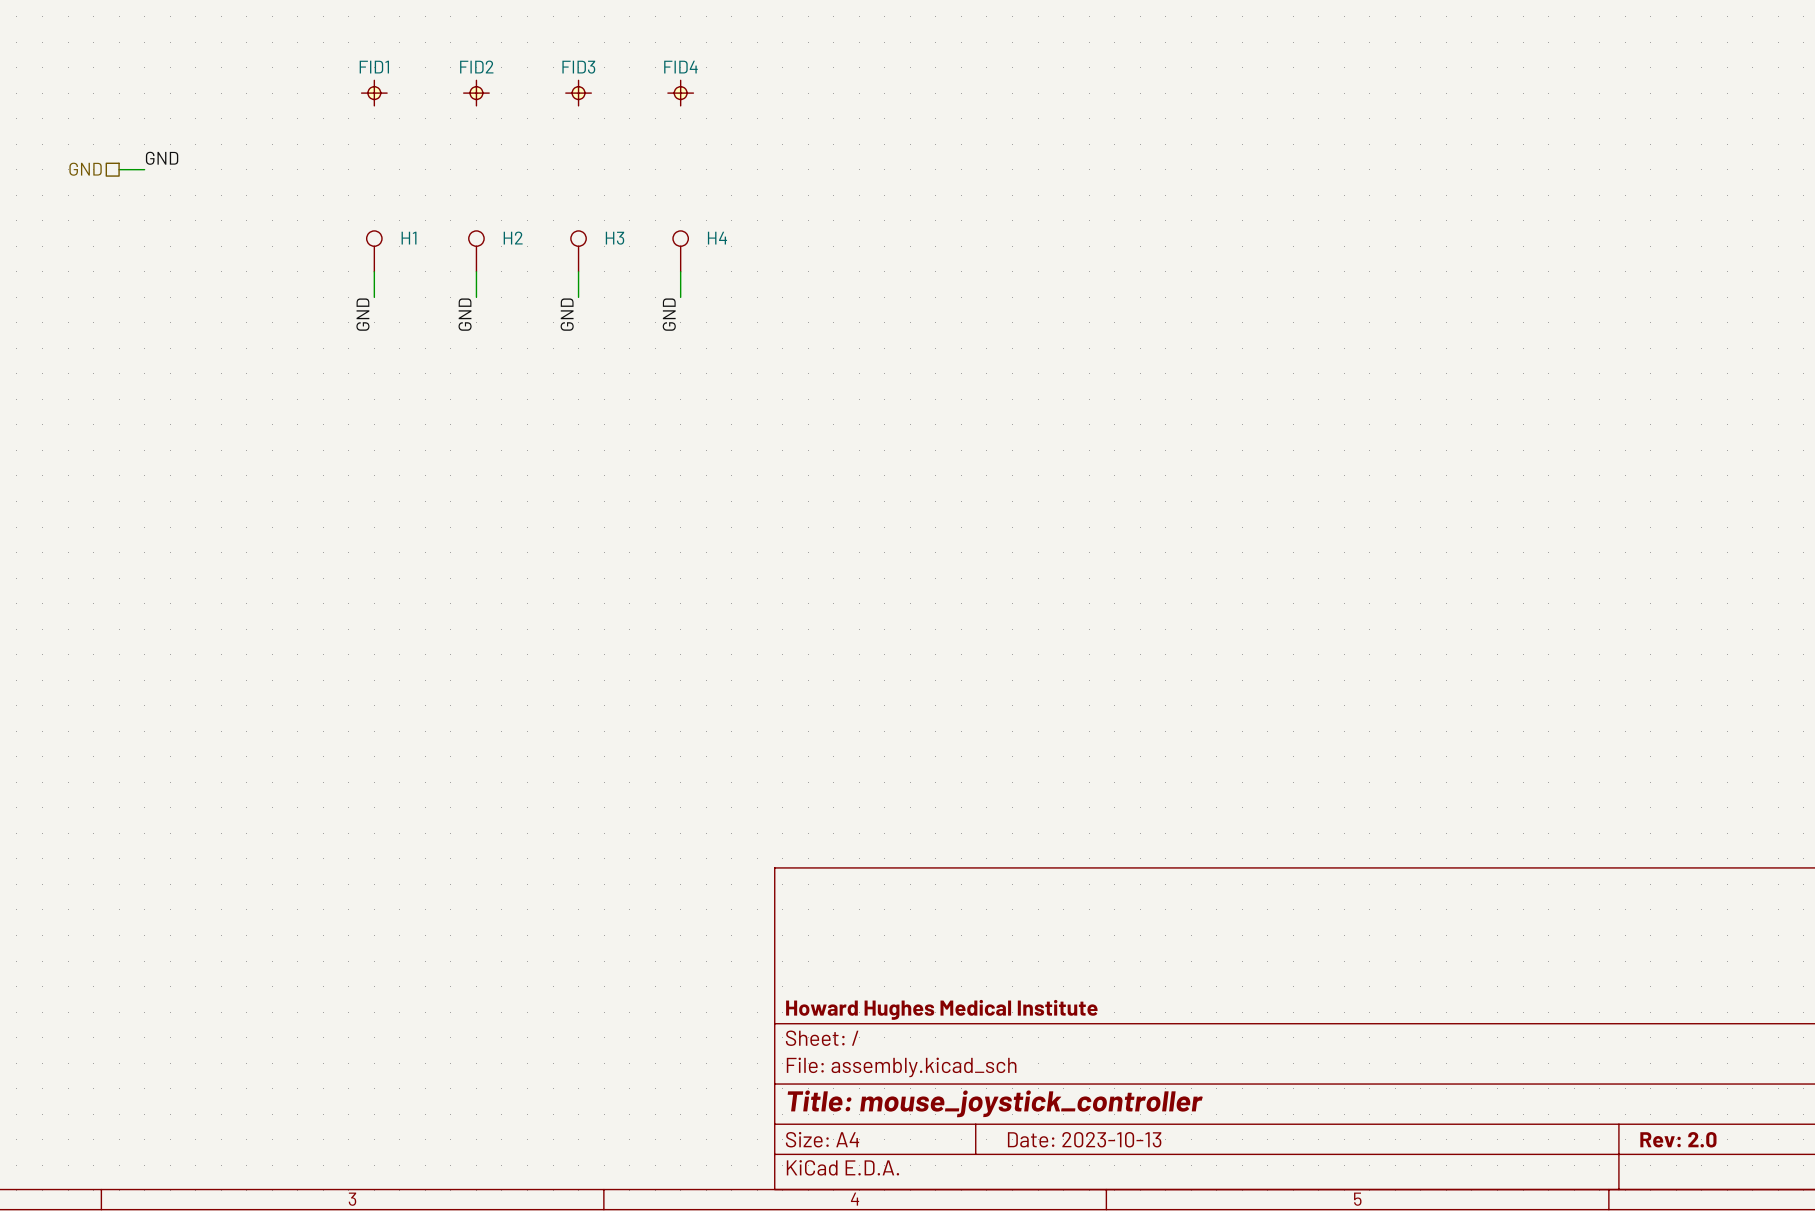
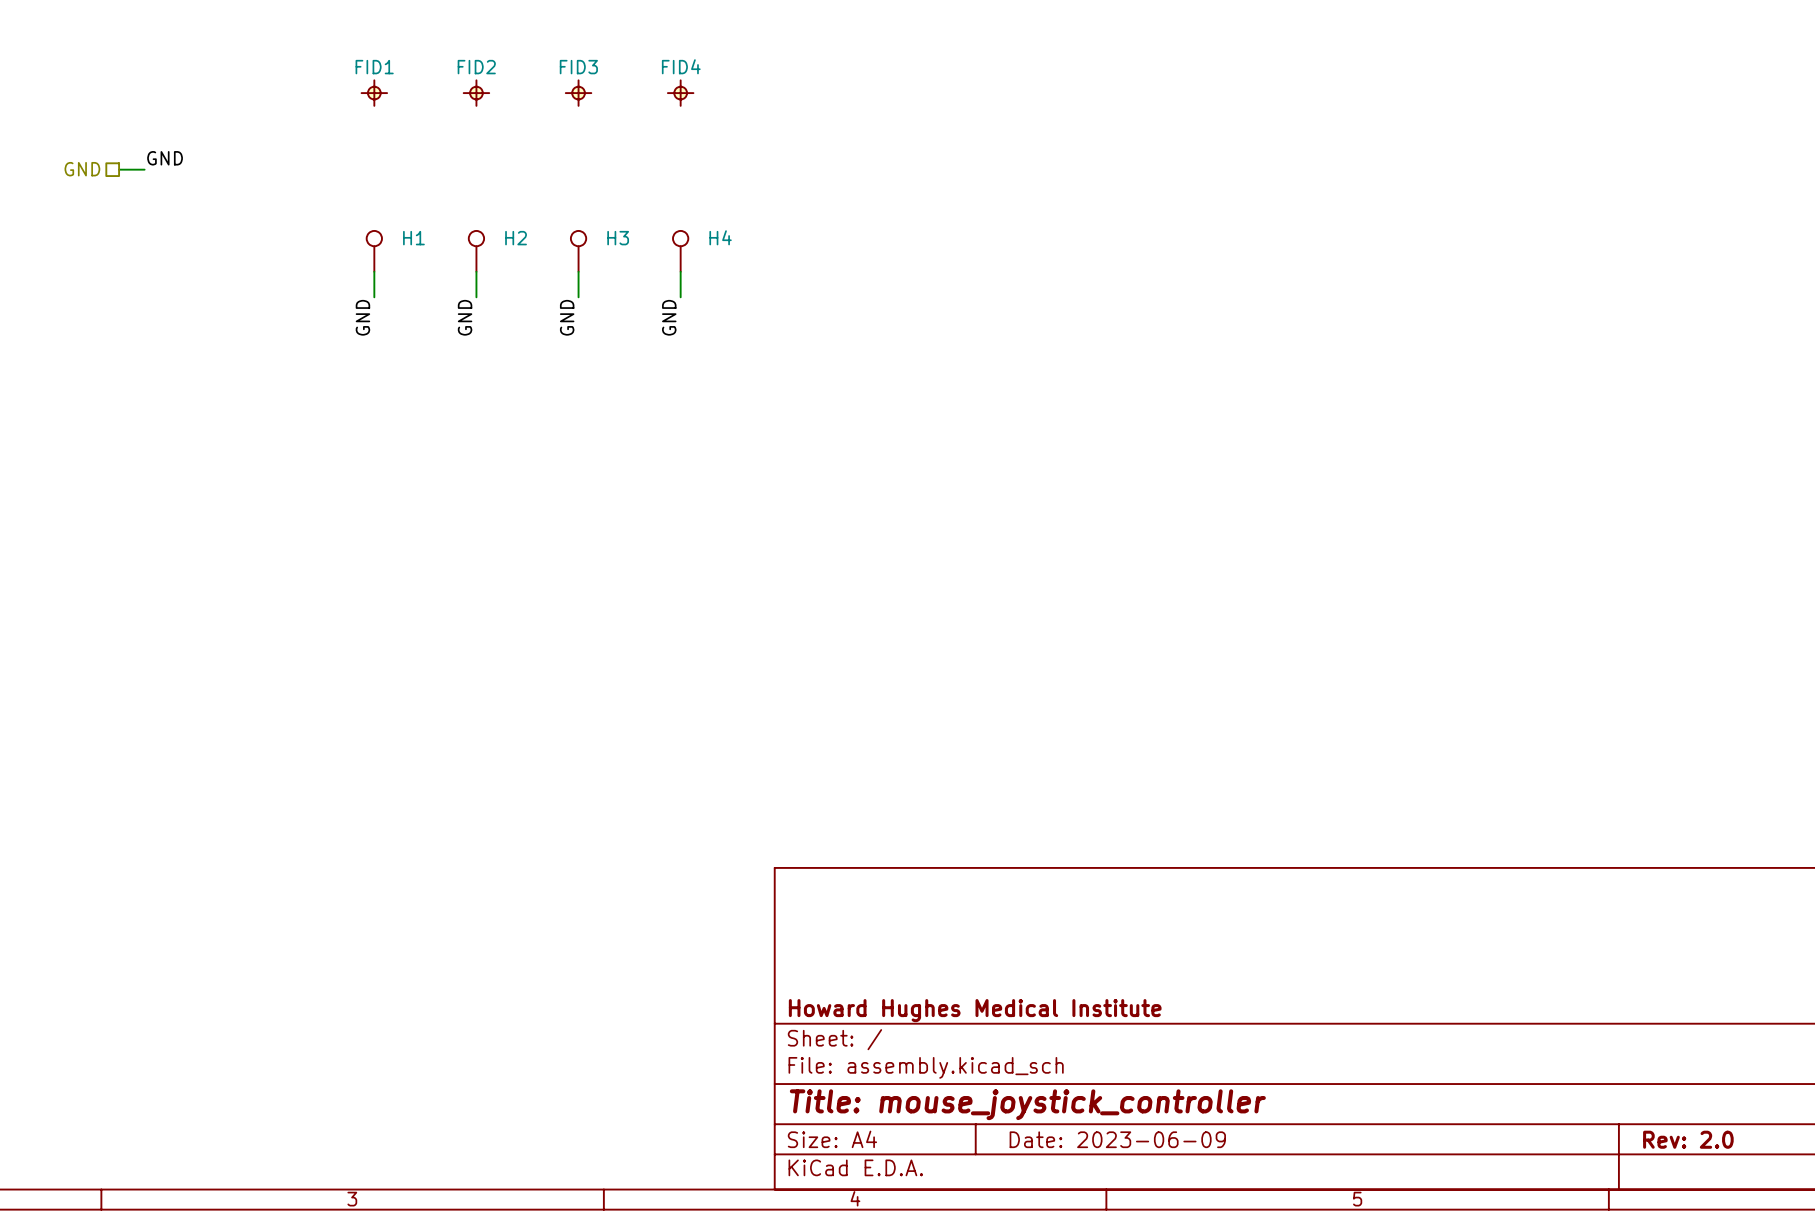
title block: Date: 2023-10-13 (1084, 1139) -> Date: 2023-06-09 (1117, 1139)

